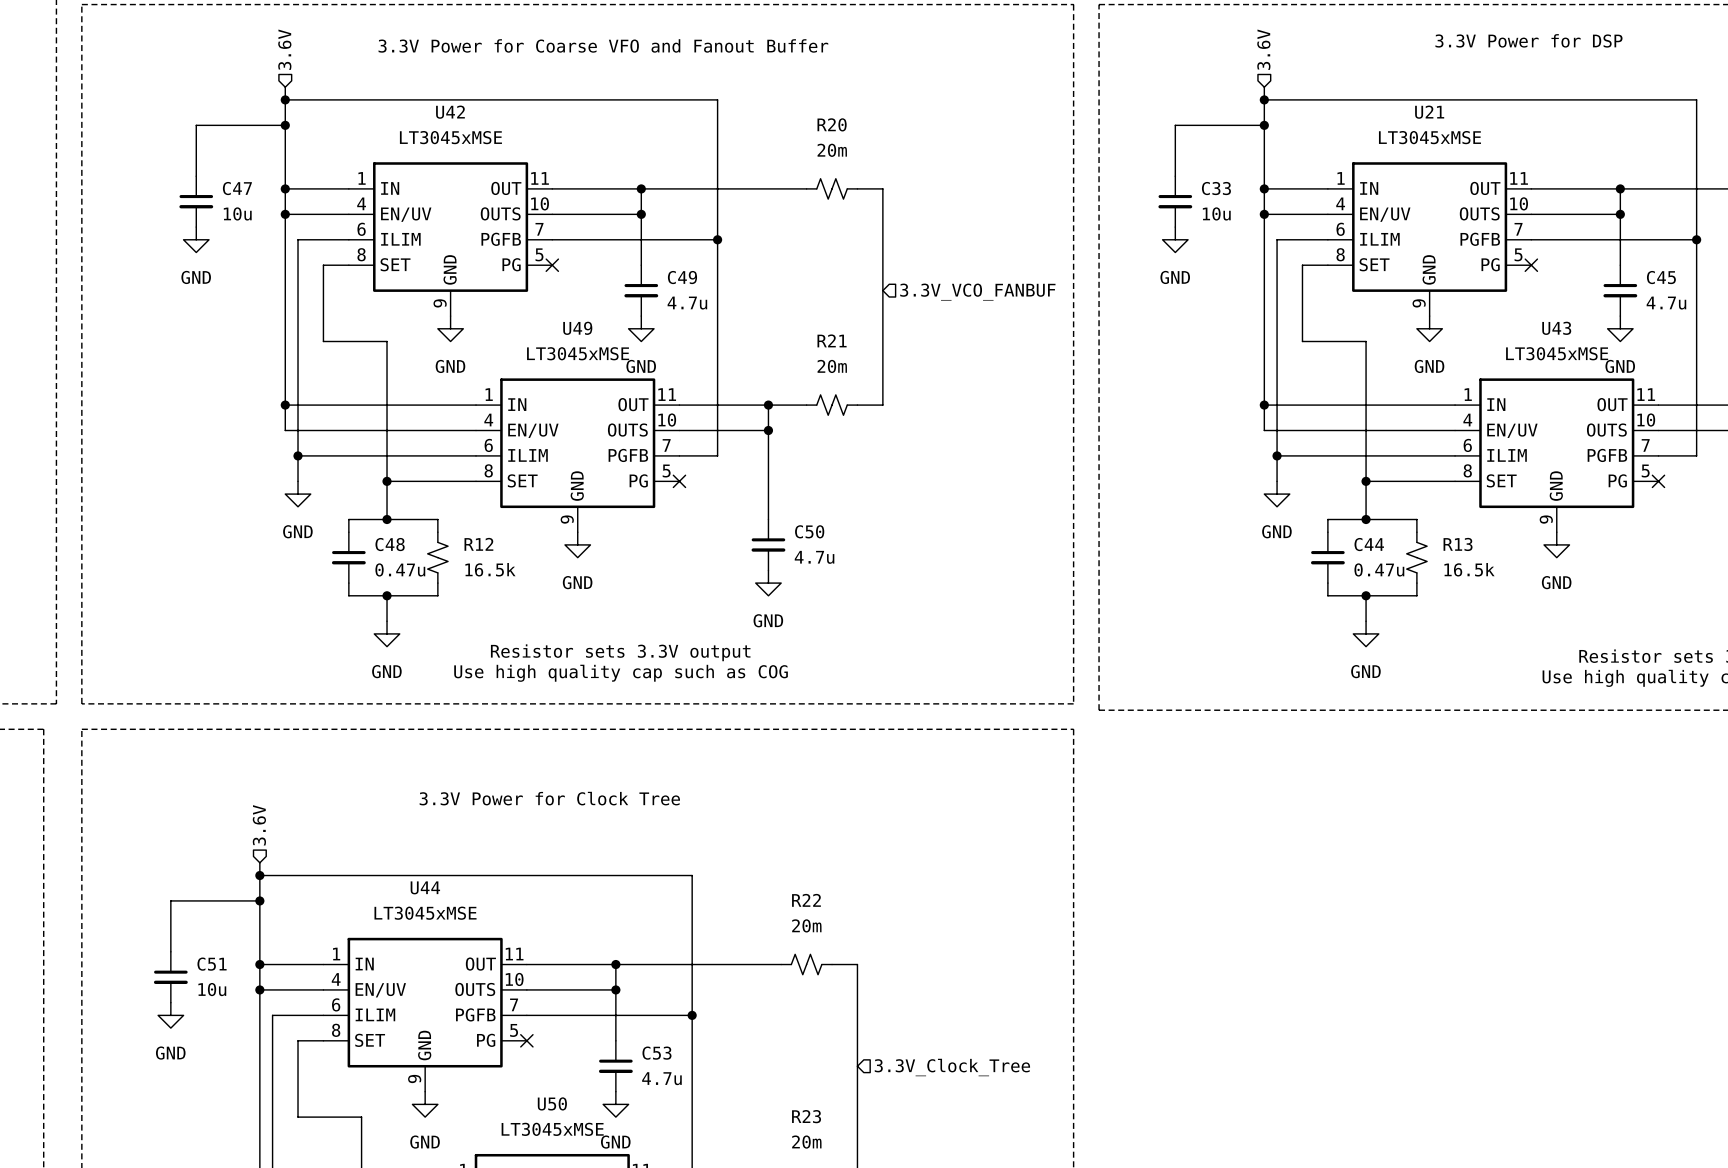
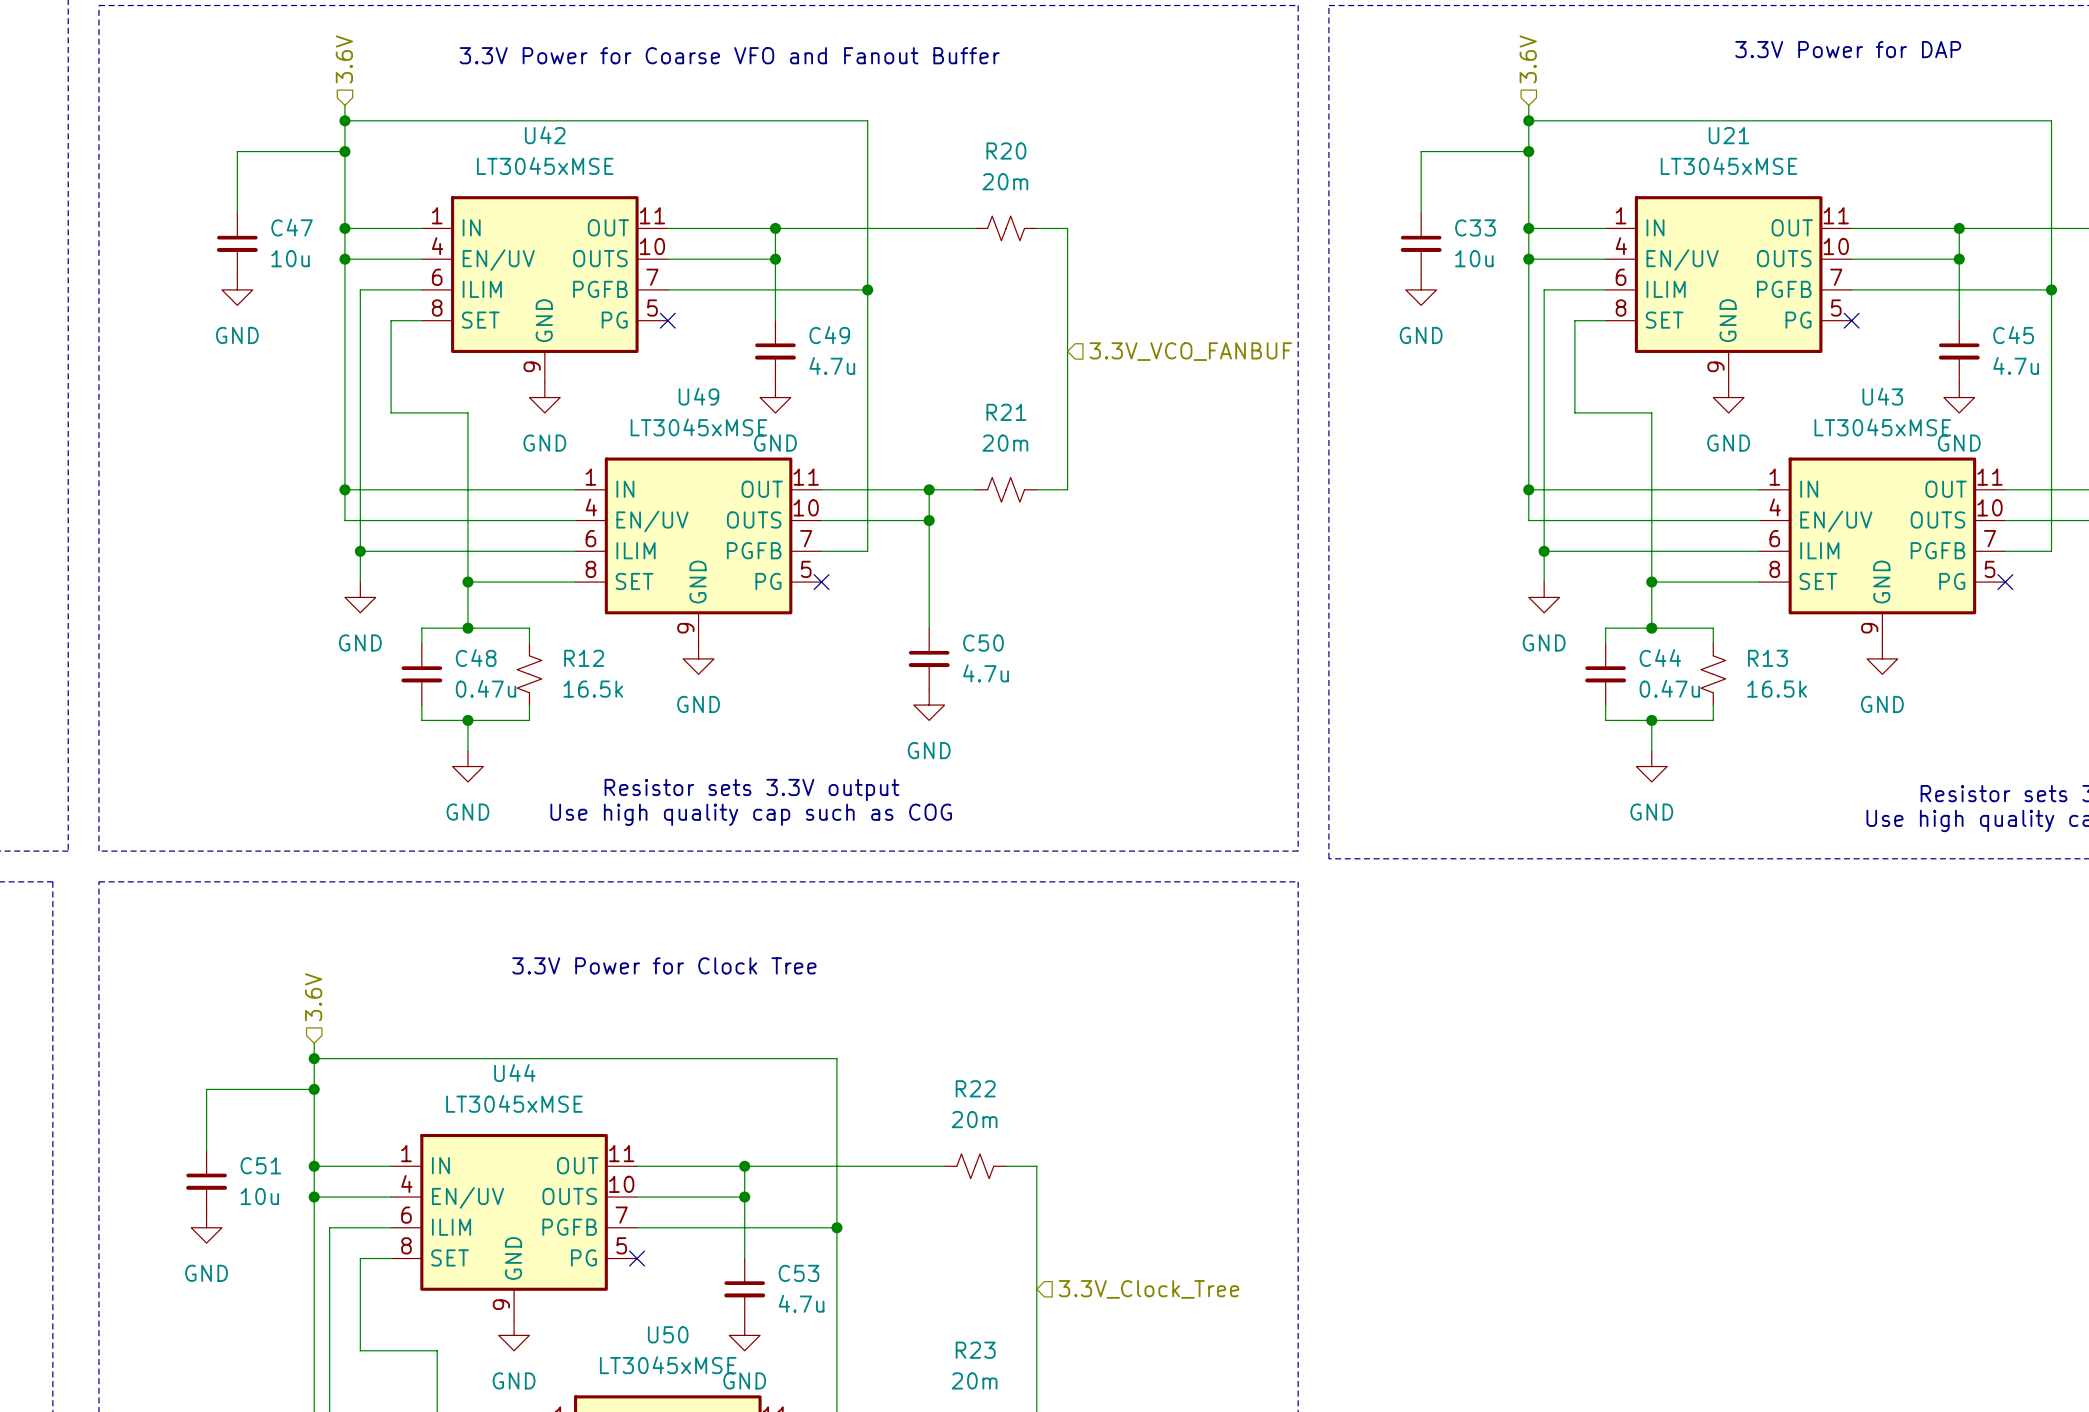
text: 3.3V Power for DSP (1528, 40) -> 3.3V Power for DAP (1848, 49)

